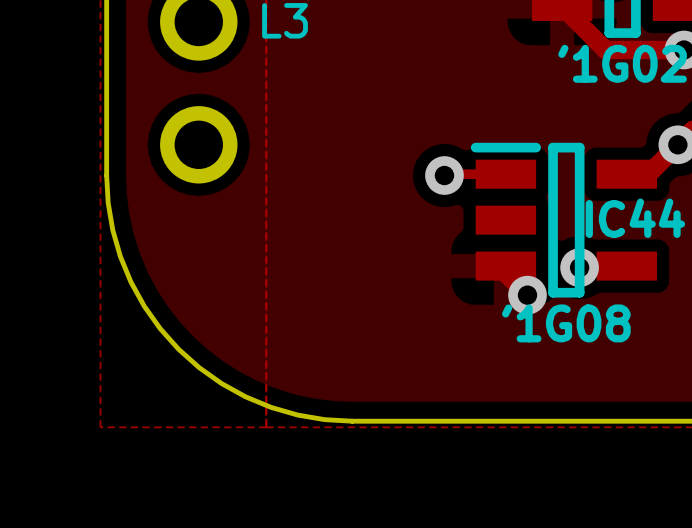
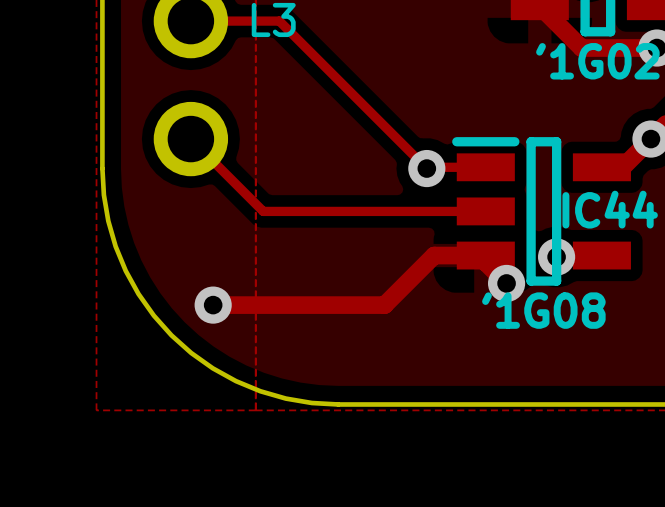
track: none -> (190, 21) (279, 21) (426, 168)
track: none -> (190, 139) (263, 211) (485, 211)
track: none -> (485, 255) (434, 255) (384, 305) (213, 305)
via: none -> (213, 305)

